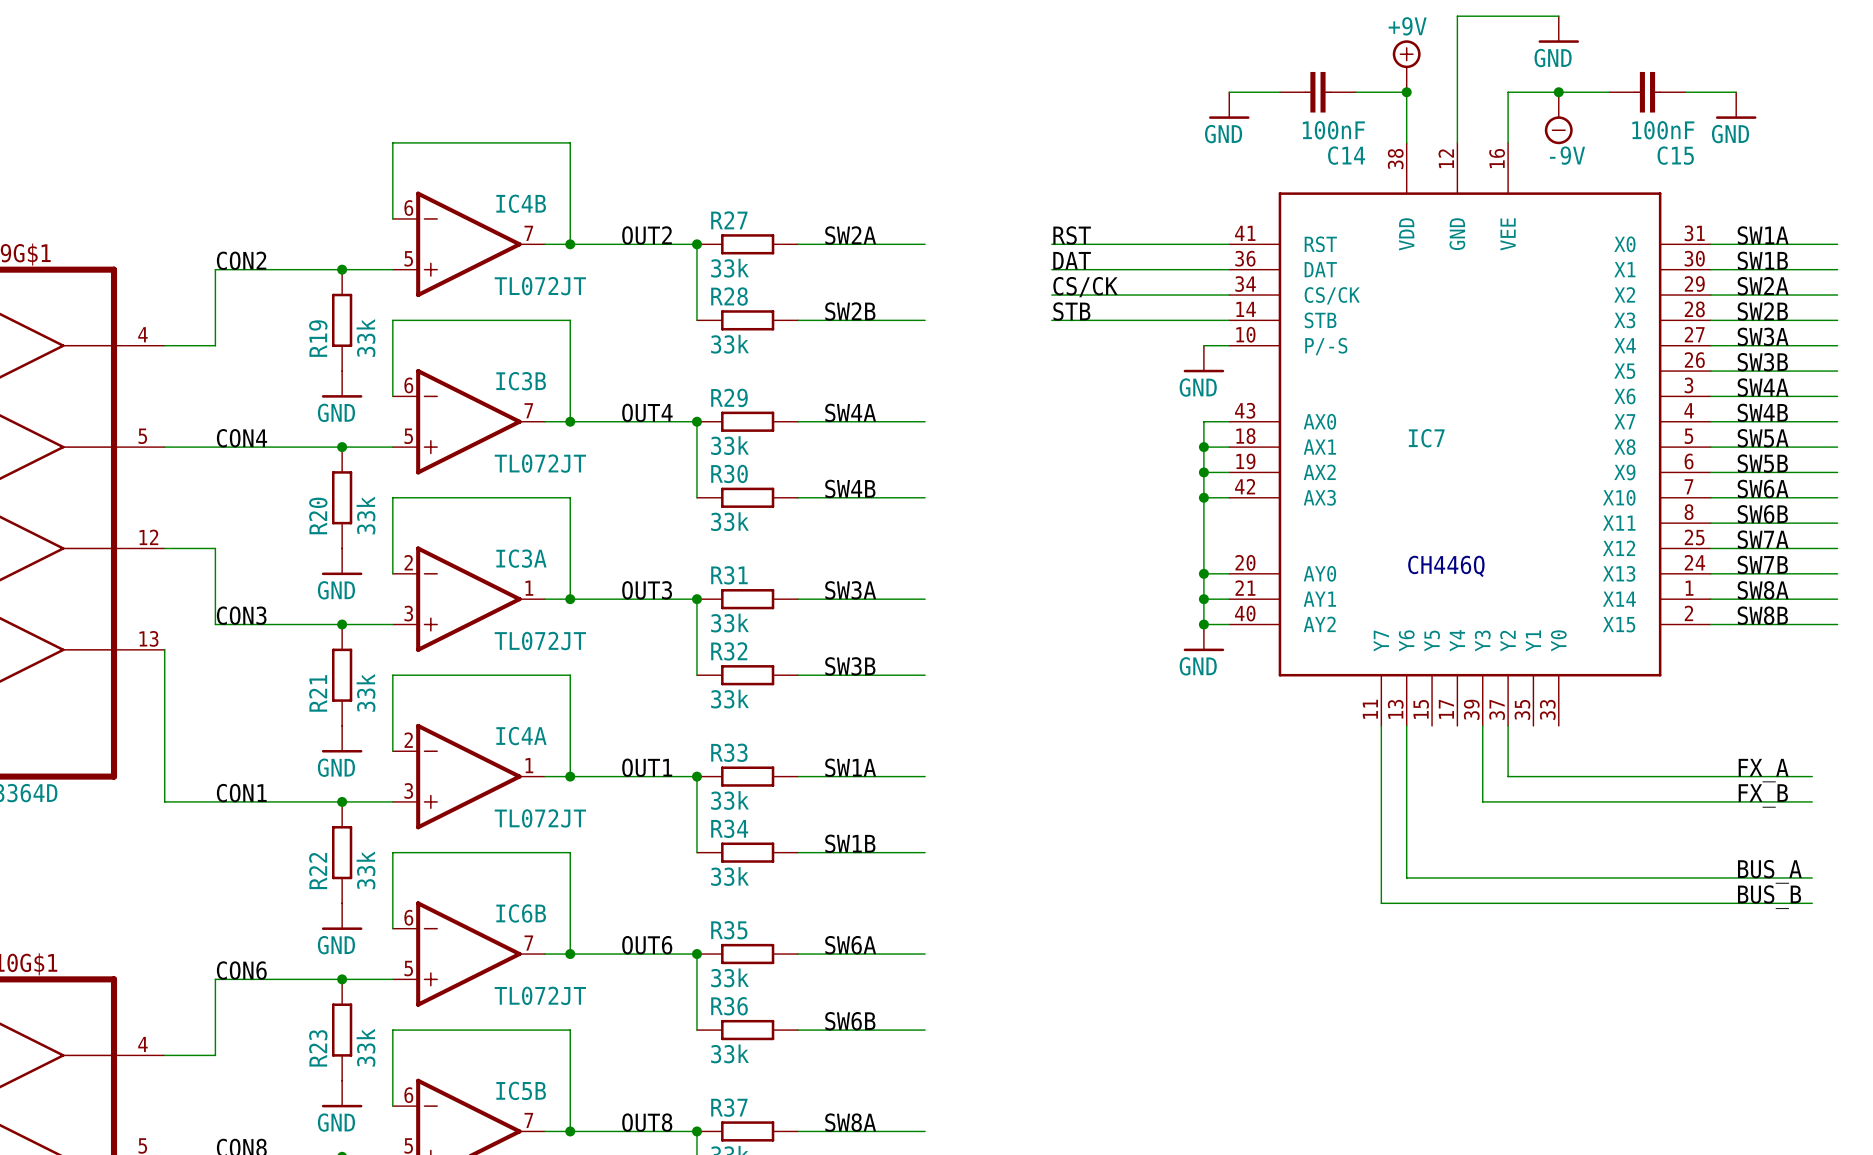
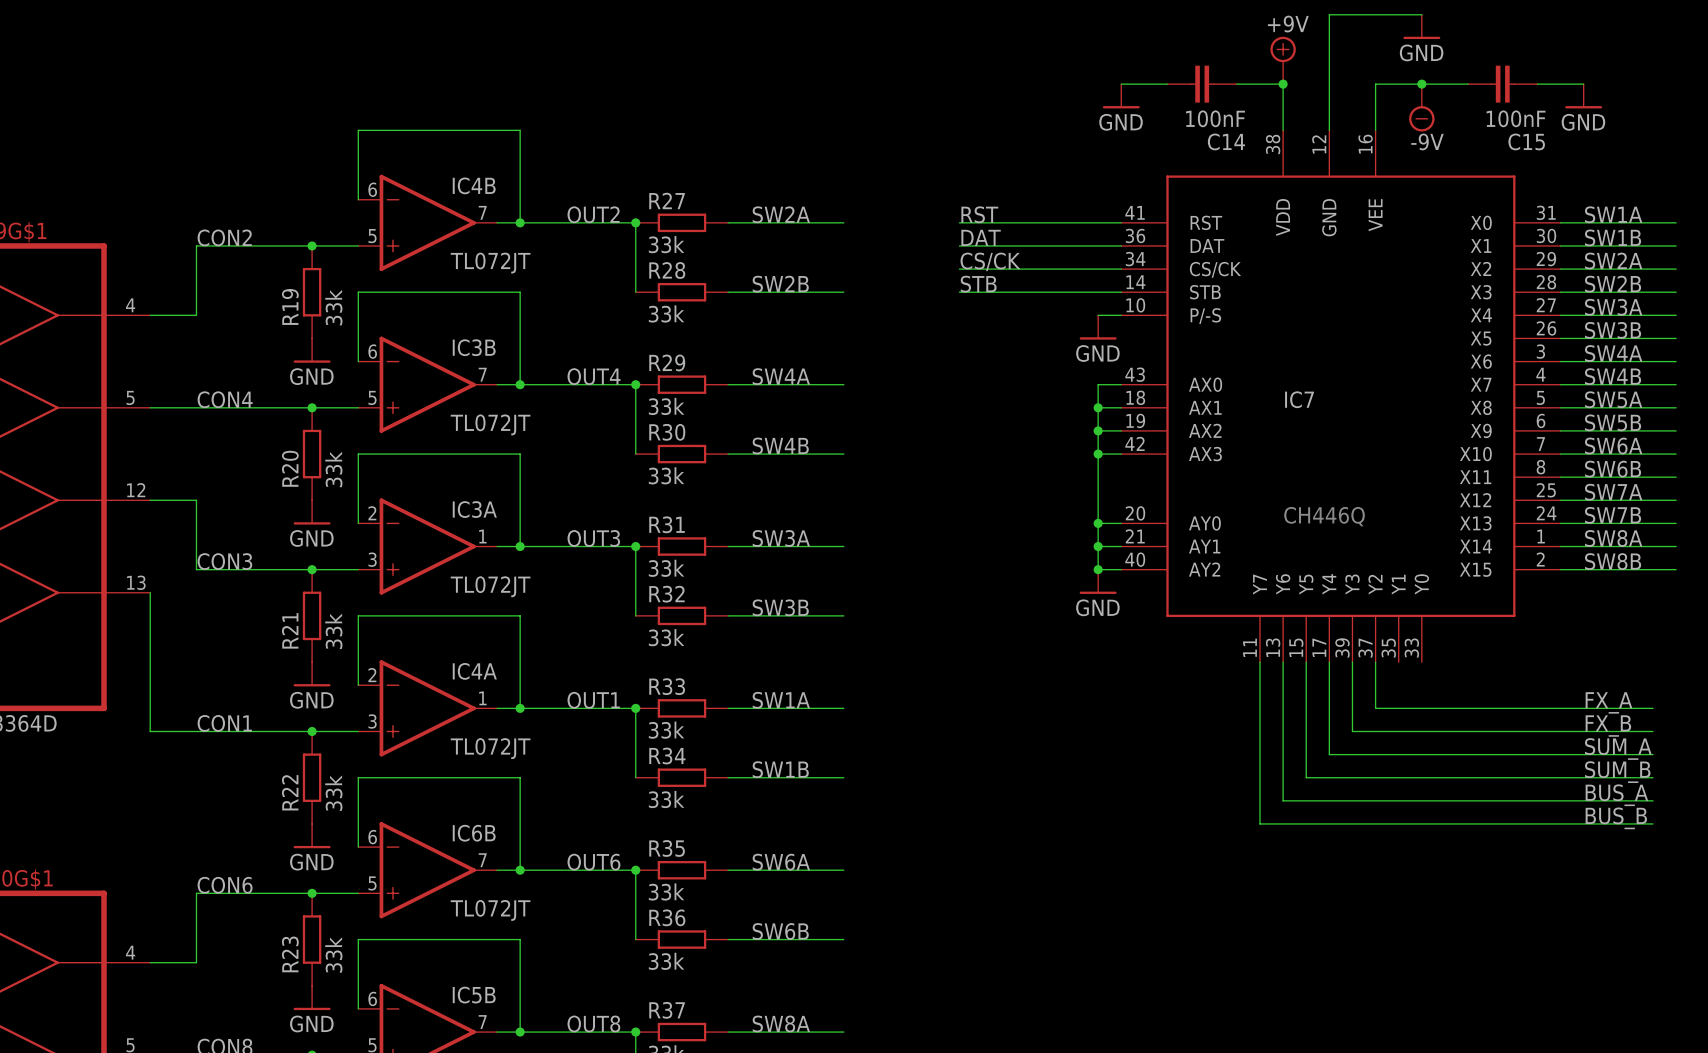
wire: none -> (1306, 662) (1306, 777) (1653, 777)
wire: none -> (1329, 662) (1329, 754) (1653, 754)
label: none -> SUM_A (1618, 748)
label: none -> SUM_B (1617, 772)

